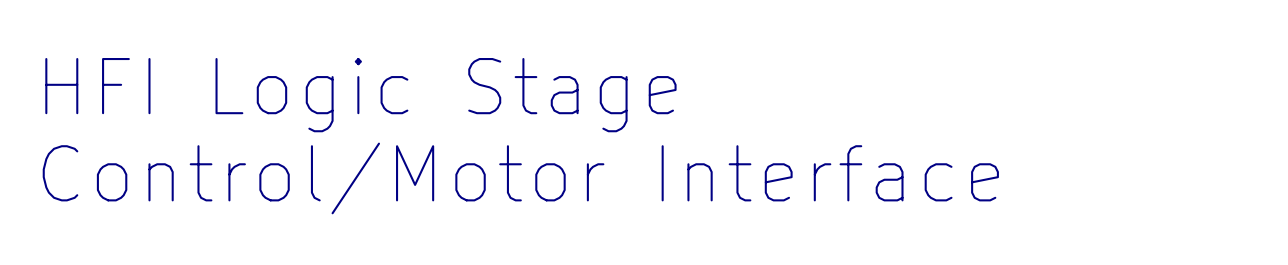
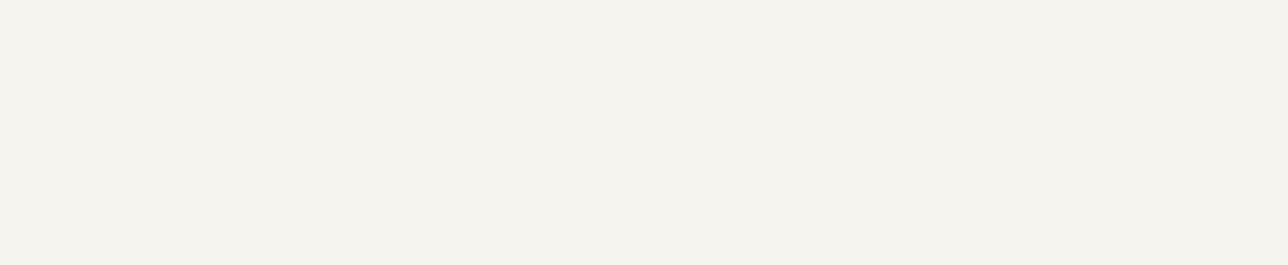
text: HFI Logic Stage (360, 95) -> none
text: Control/Motor Interface (520, 178) -> none

